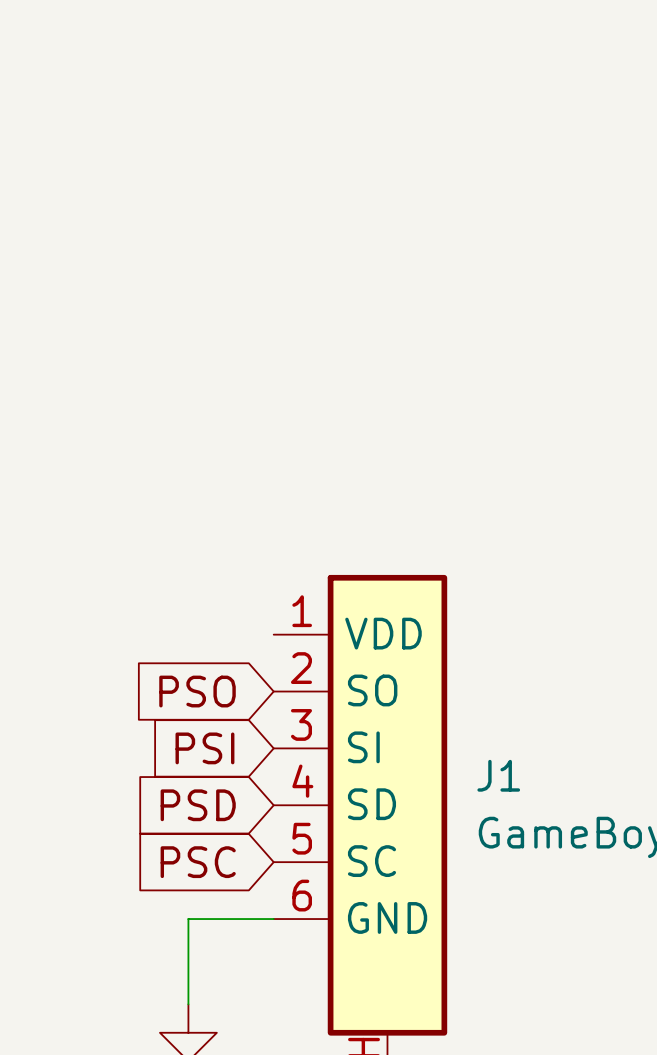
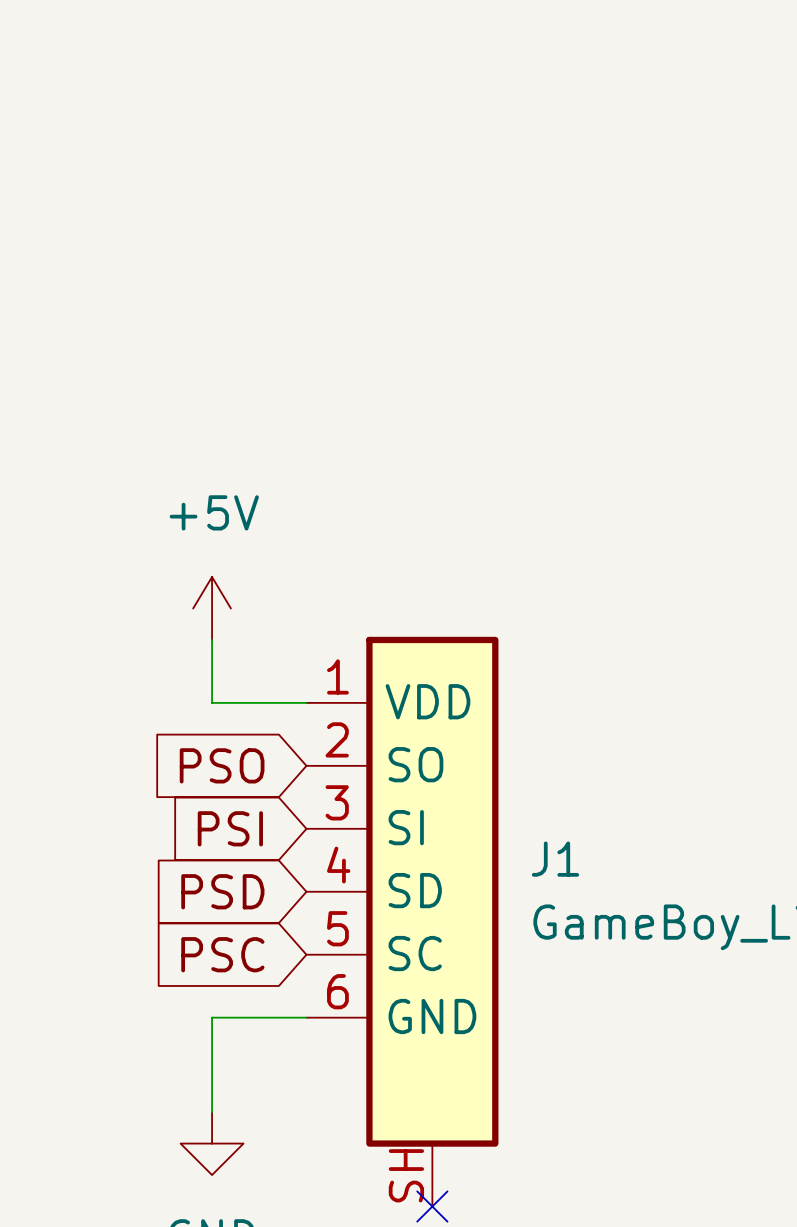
power symbol: none -> +5V (212, 608)
wire: none -> (212, 639) (212, 702) (306, 702)

